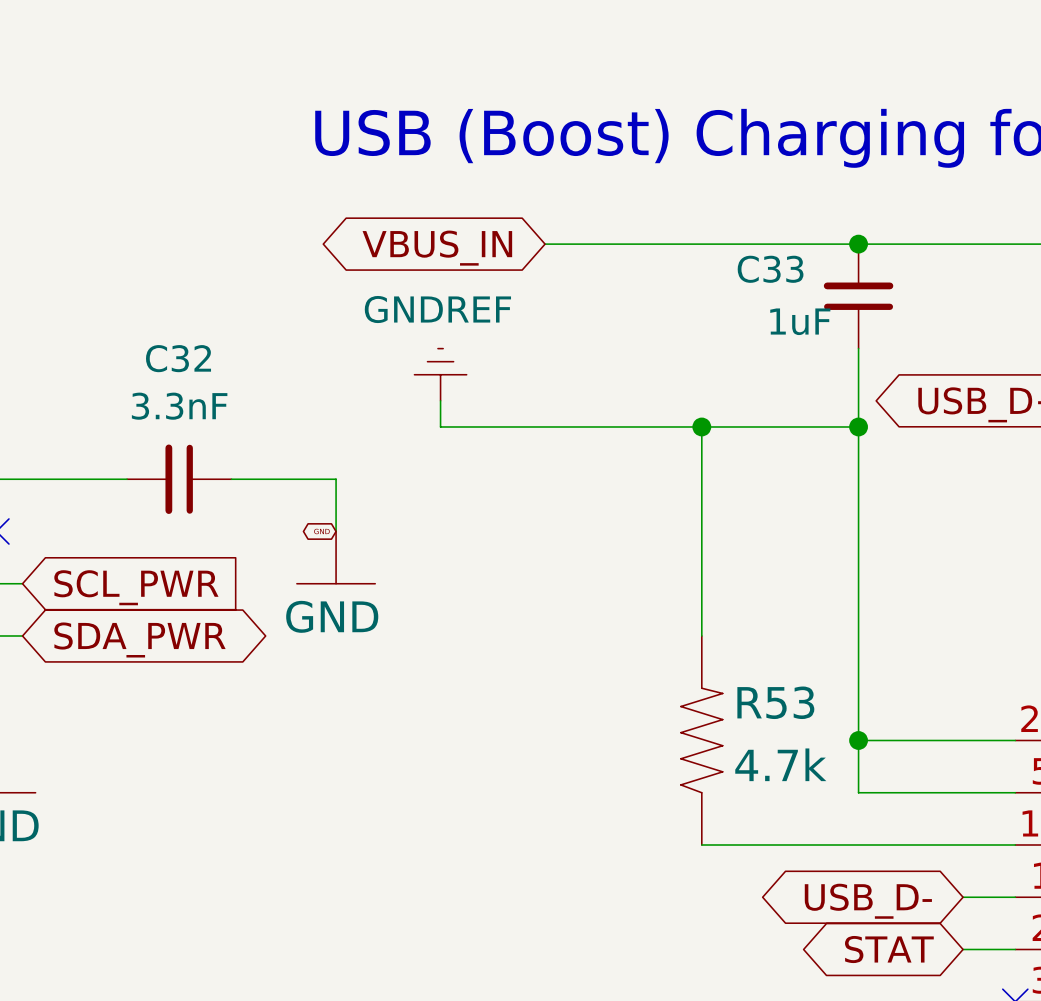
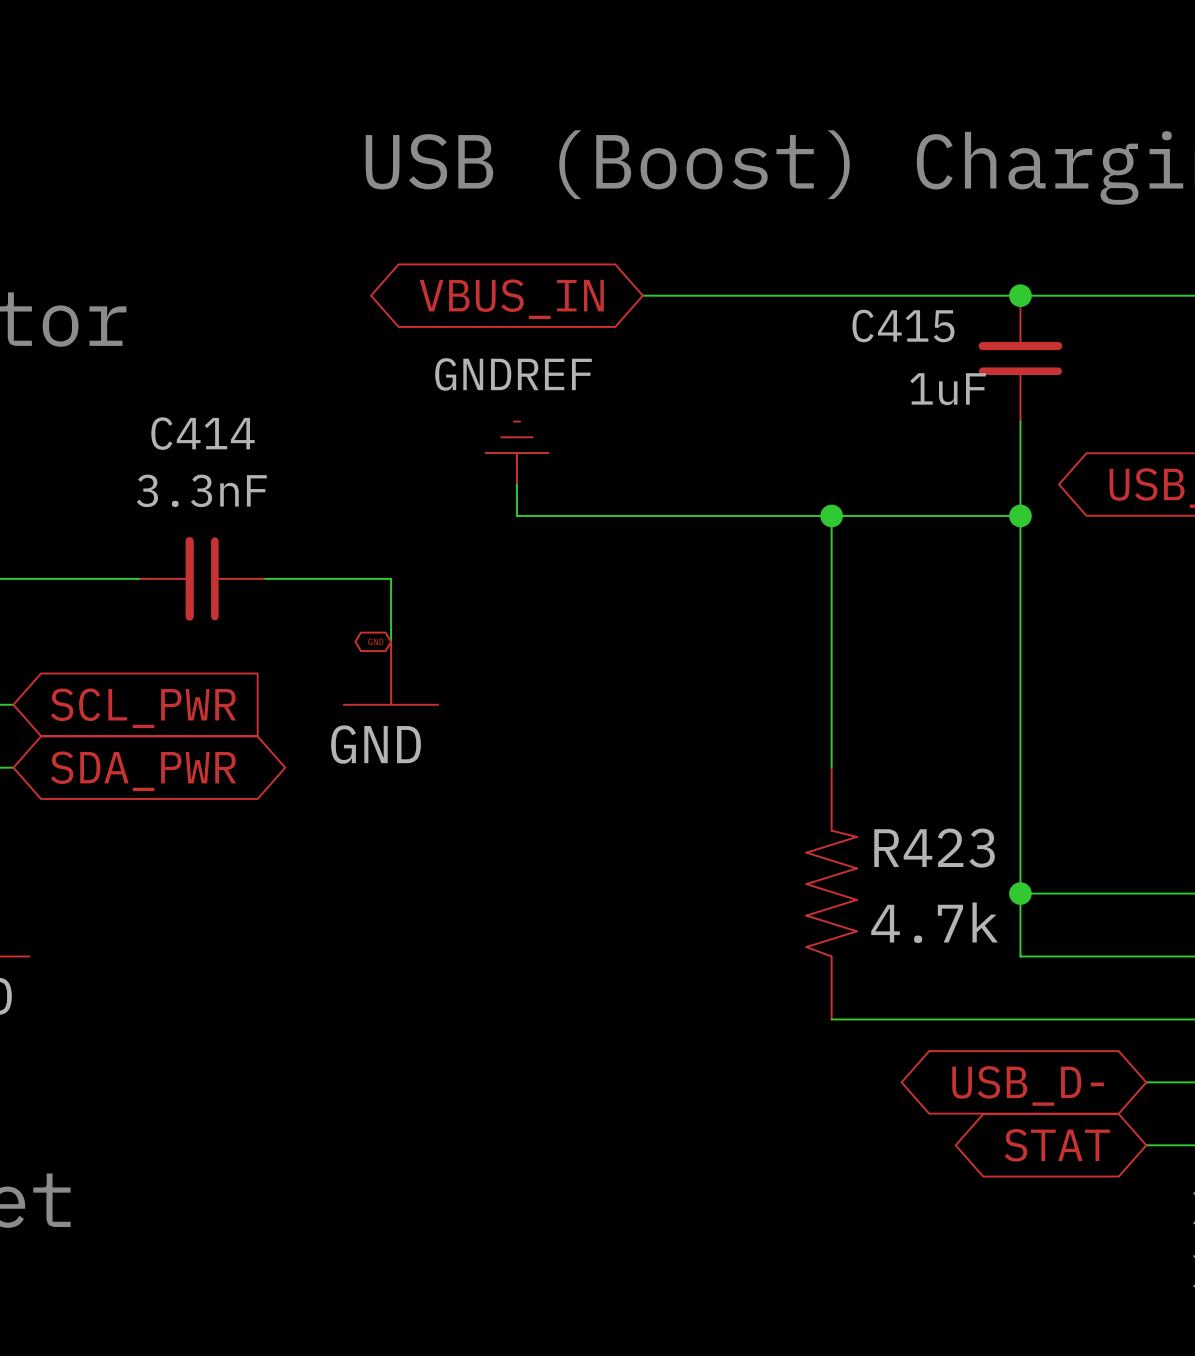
C33 name: C33 (770, 269) -> C415 (903, 325)
C32 name: C32 (178, 358) -> C414 (202, 433)
R53 name: R53 (775, 702) -> R423 (934, 848)

